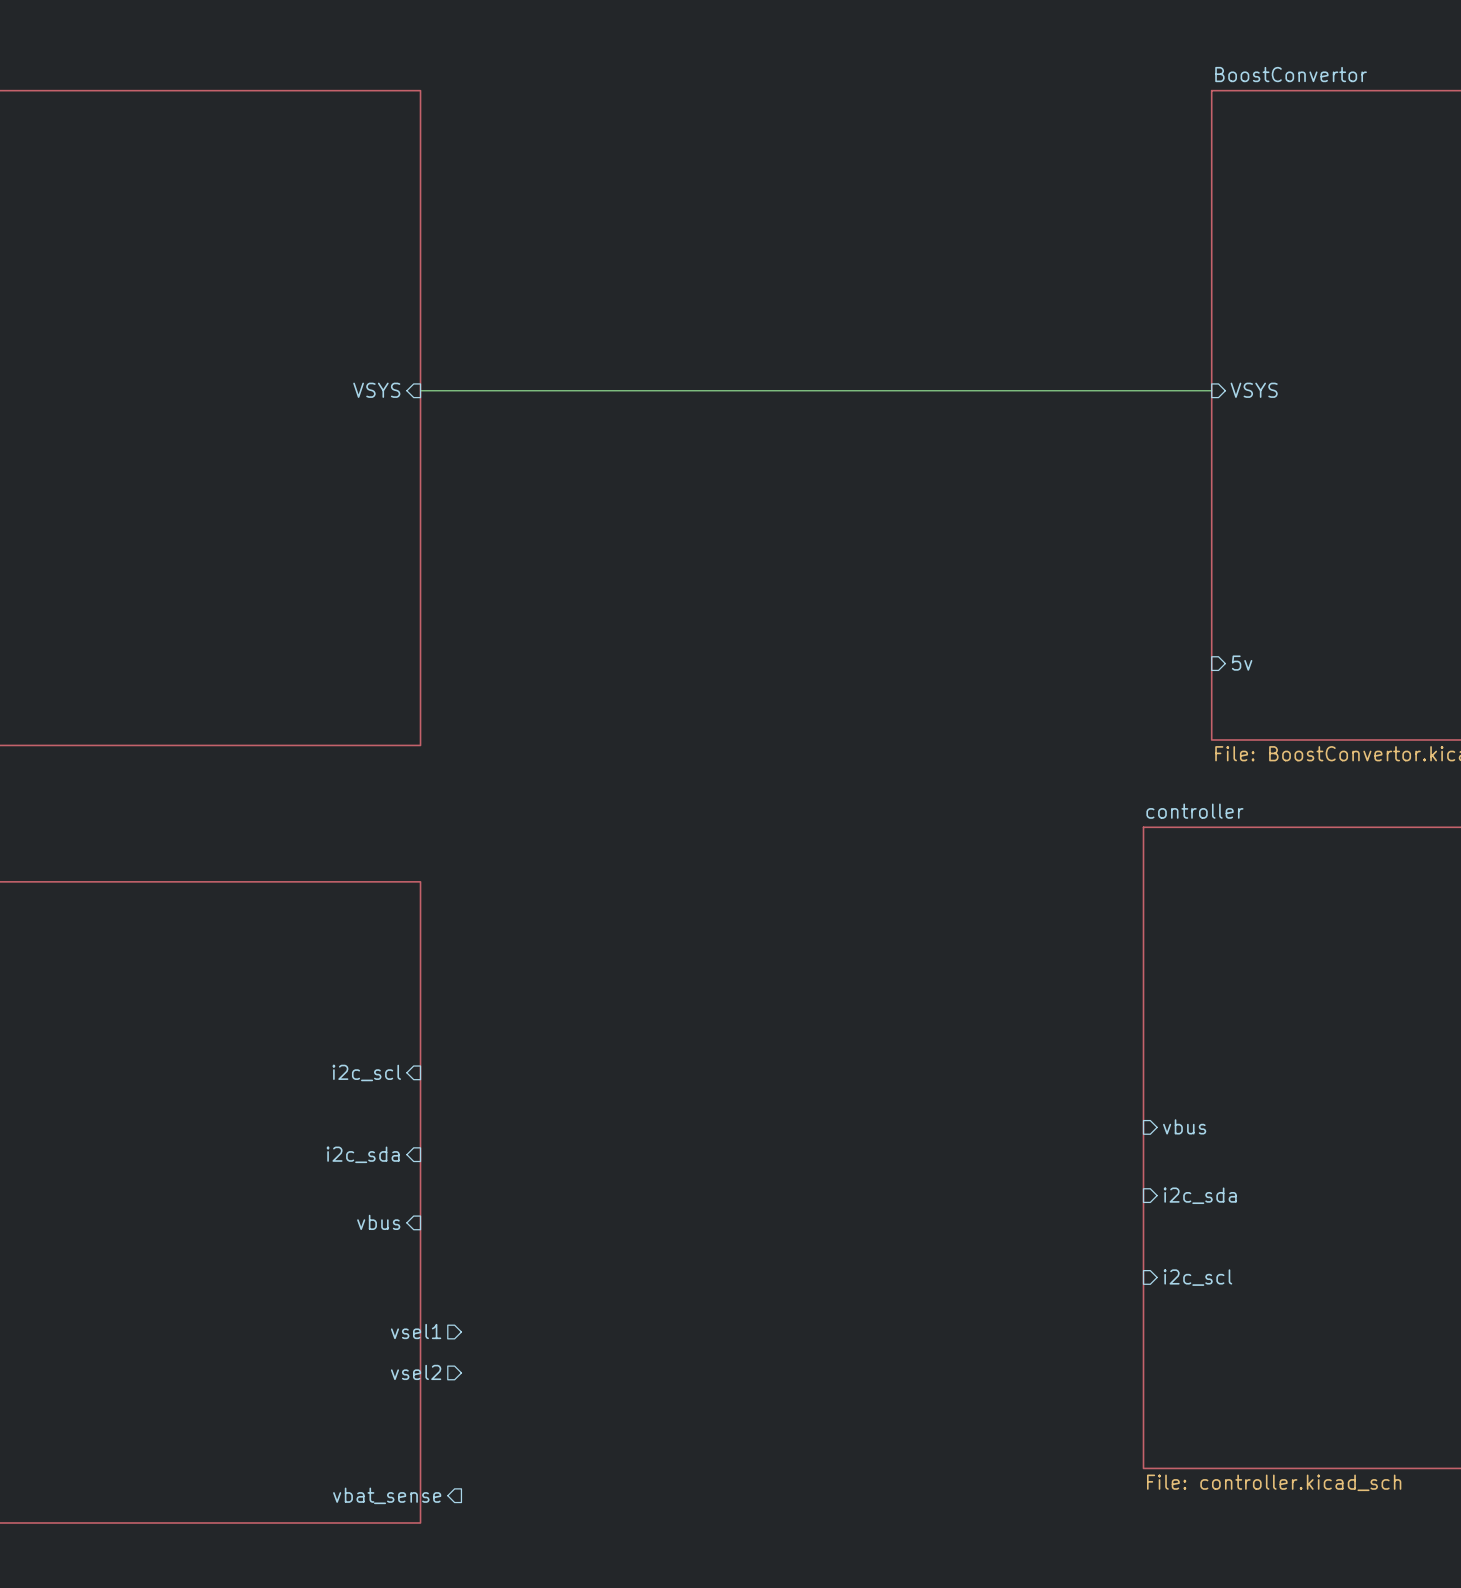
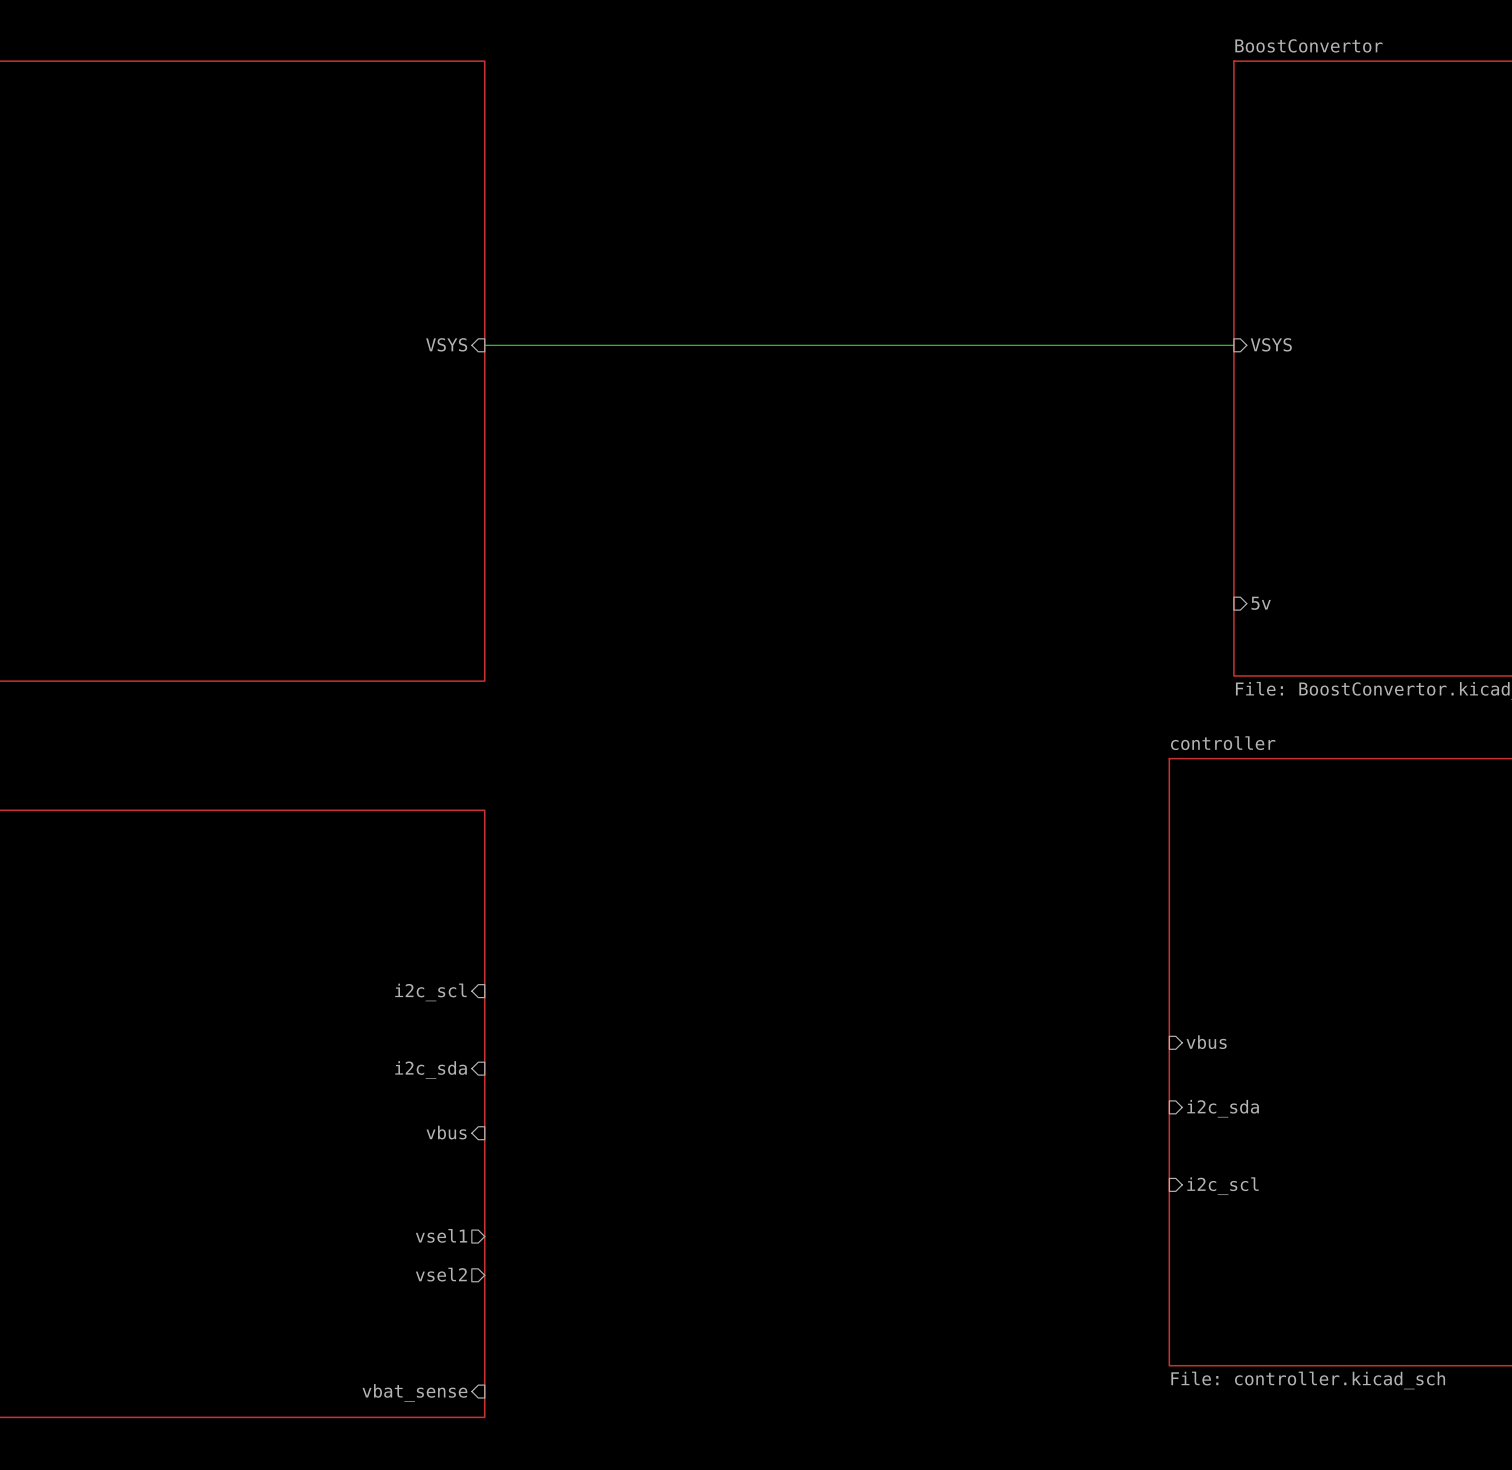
sheet pin position: vsel1 (416, 1331) -> vsel1 (441, 1235)
sheet pin position: vsel2 (416, 1372) -> vsel2 (441, 1274)
sheet pin position: vbat_sense (387, 1495) -> vbat_sense (414, 1392)

